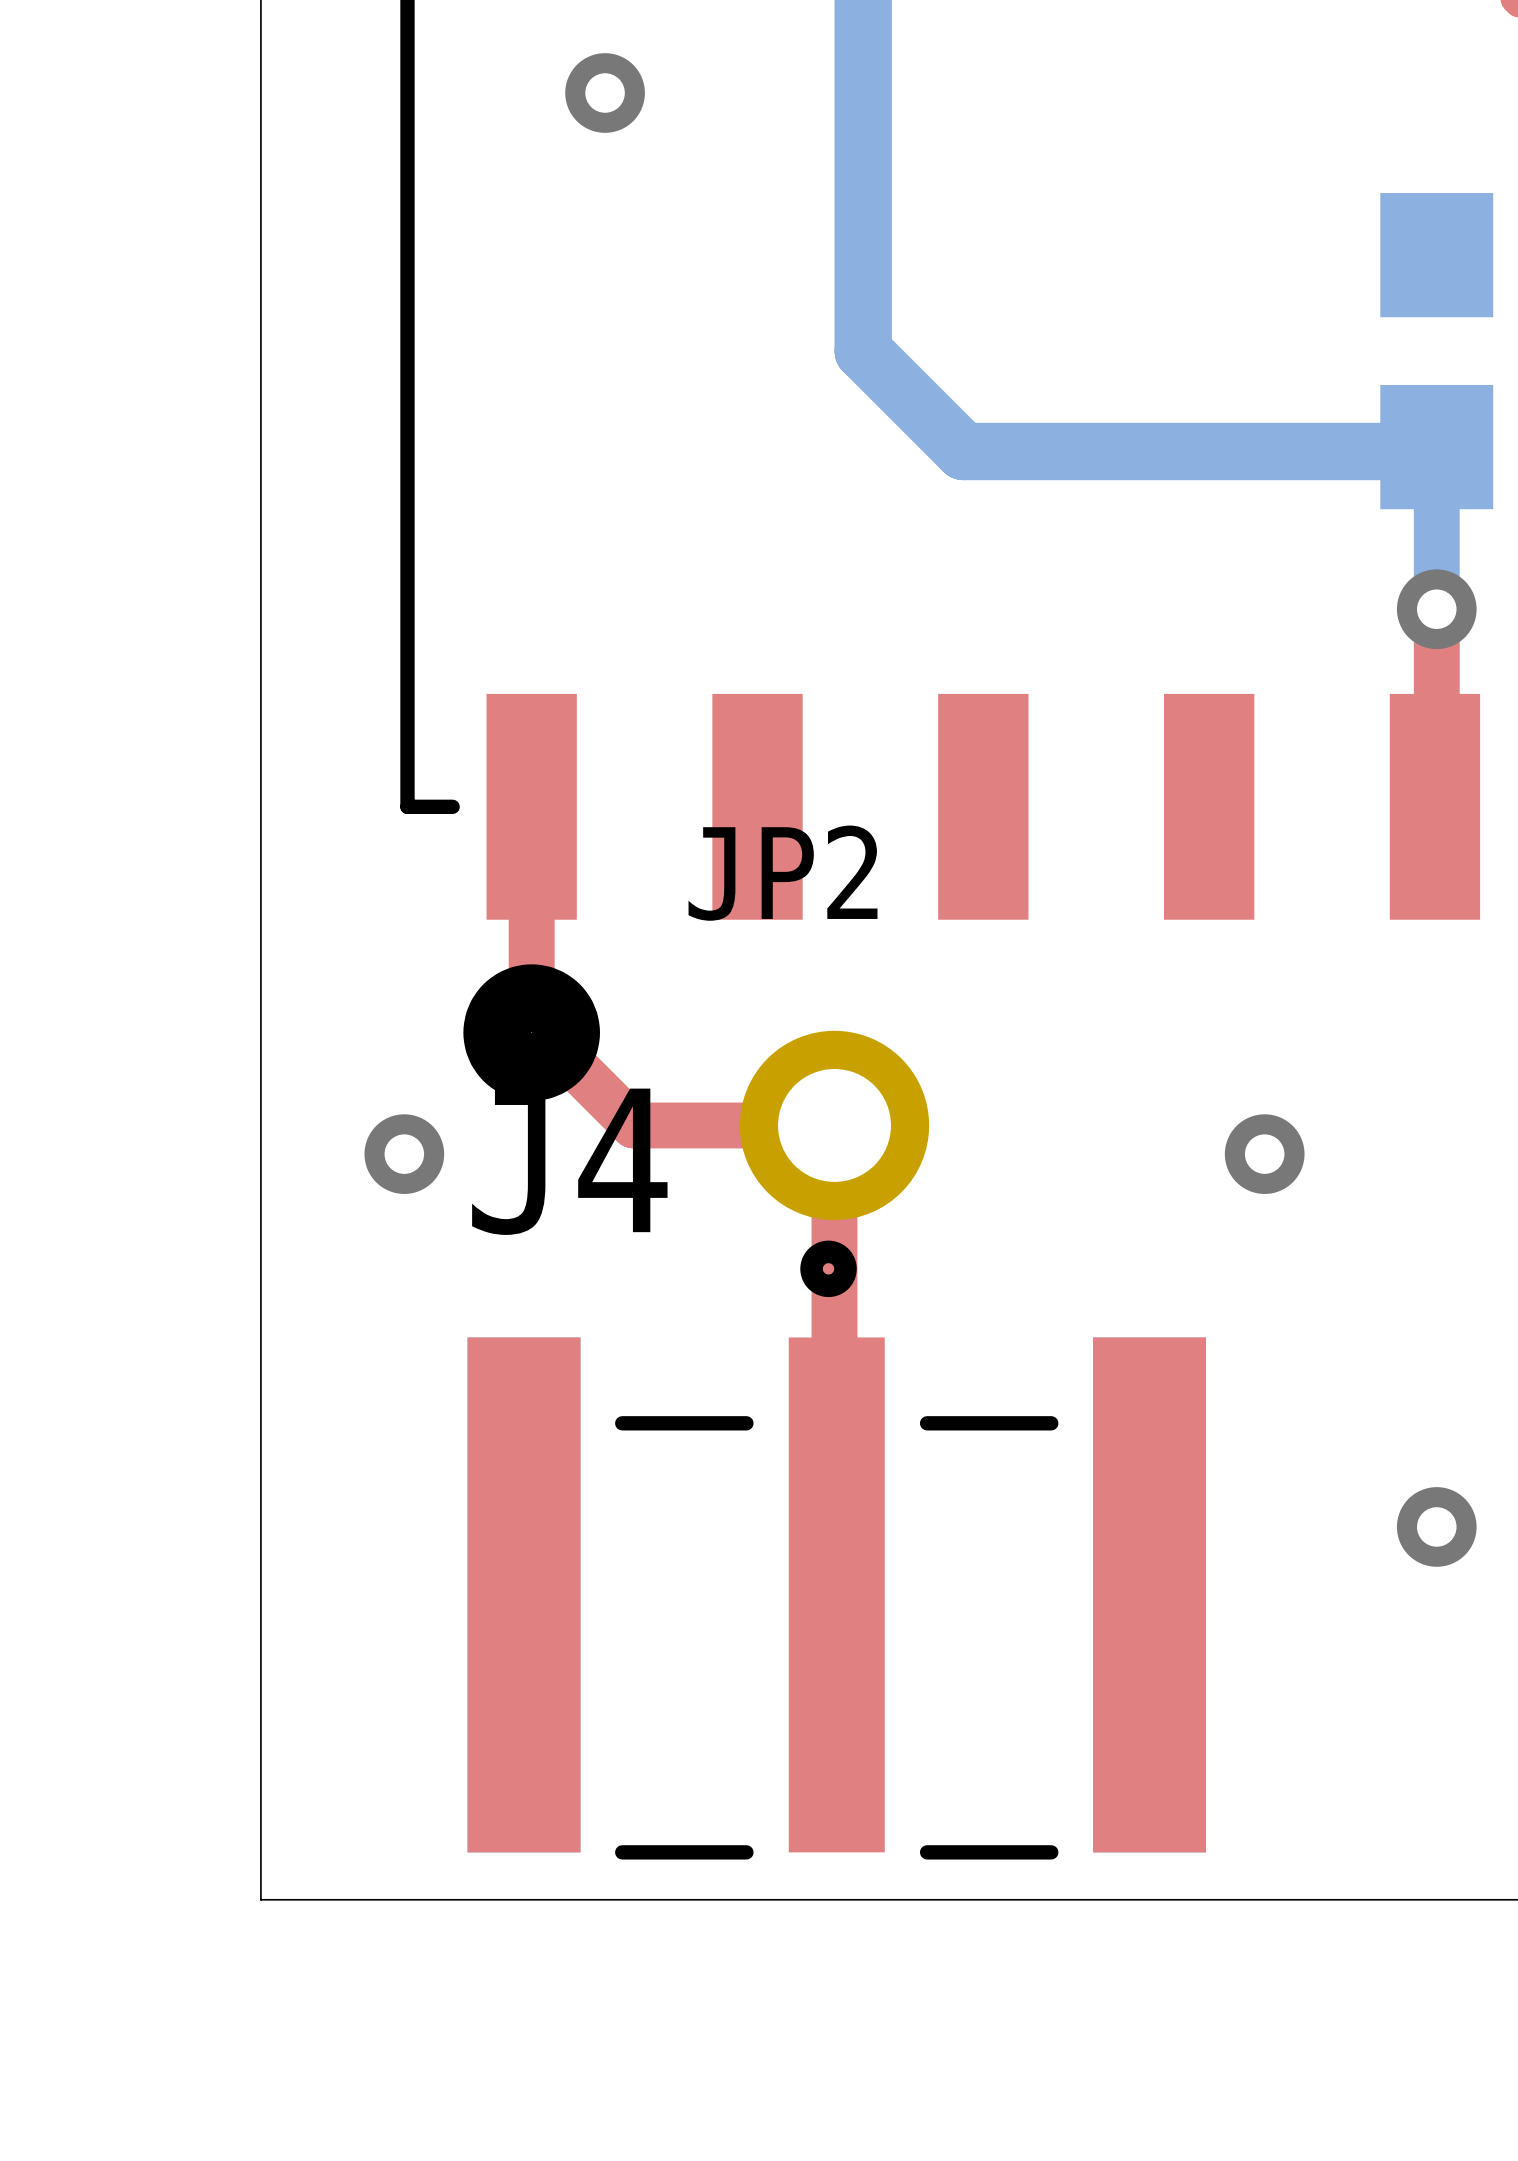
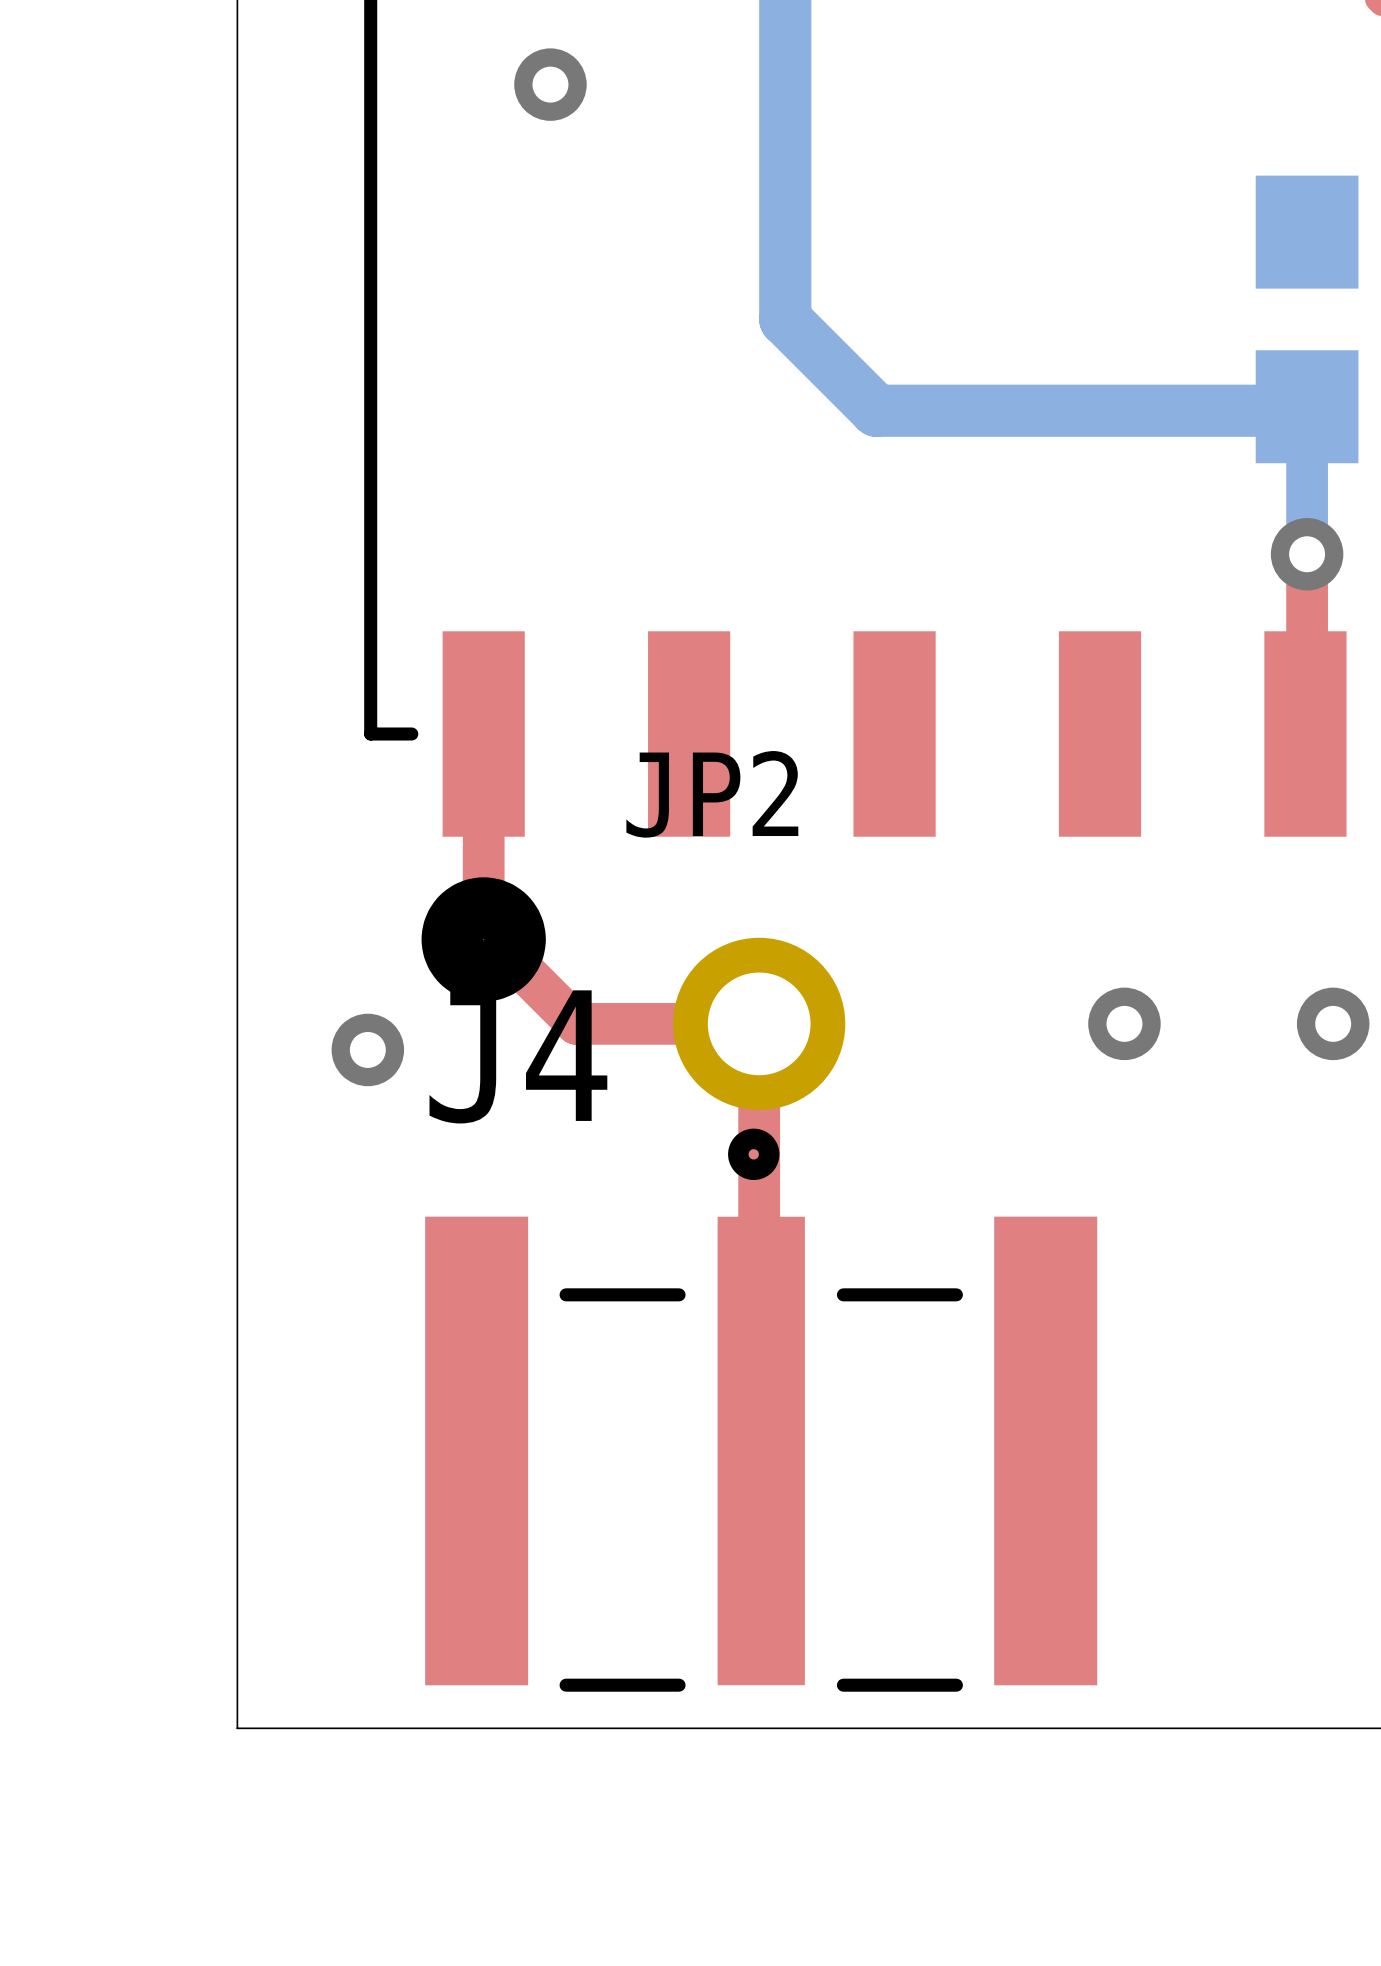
via: none -> (1333, 1023)
via position: (1264, 1154) -> (1124, 1023)
via: (1436, 1526) -> none

